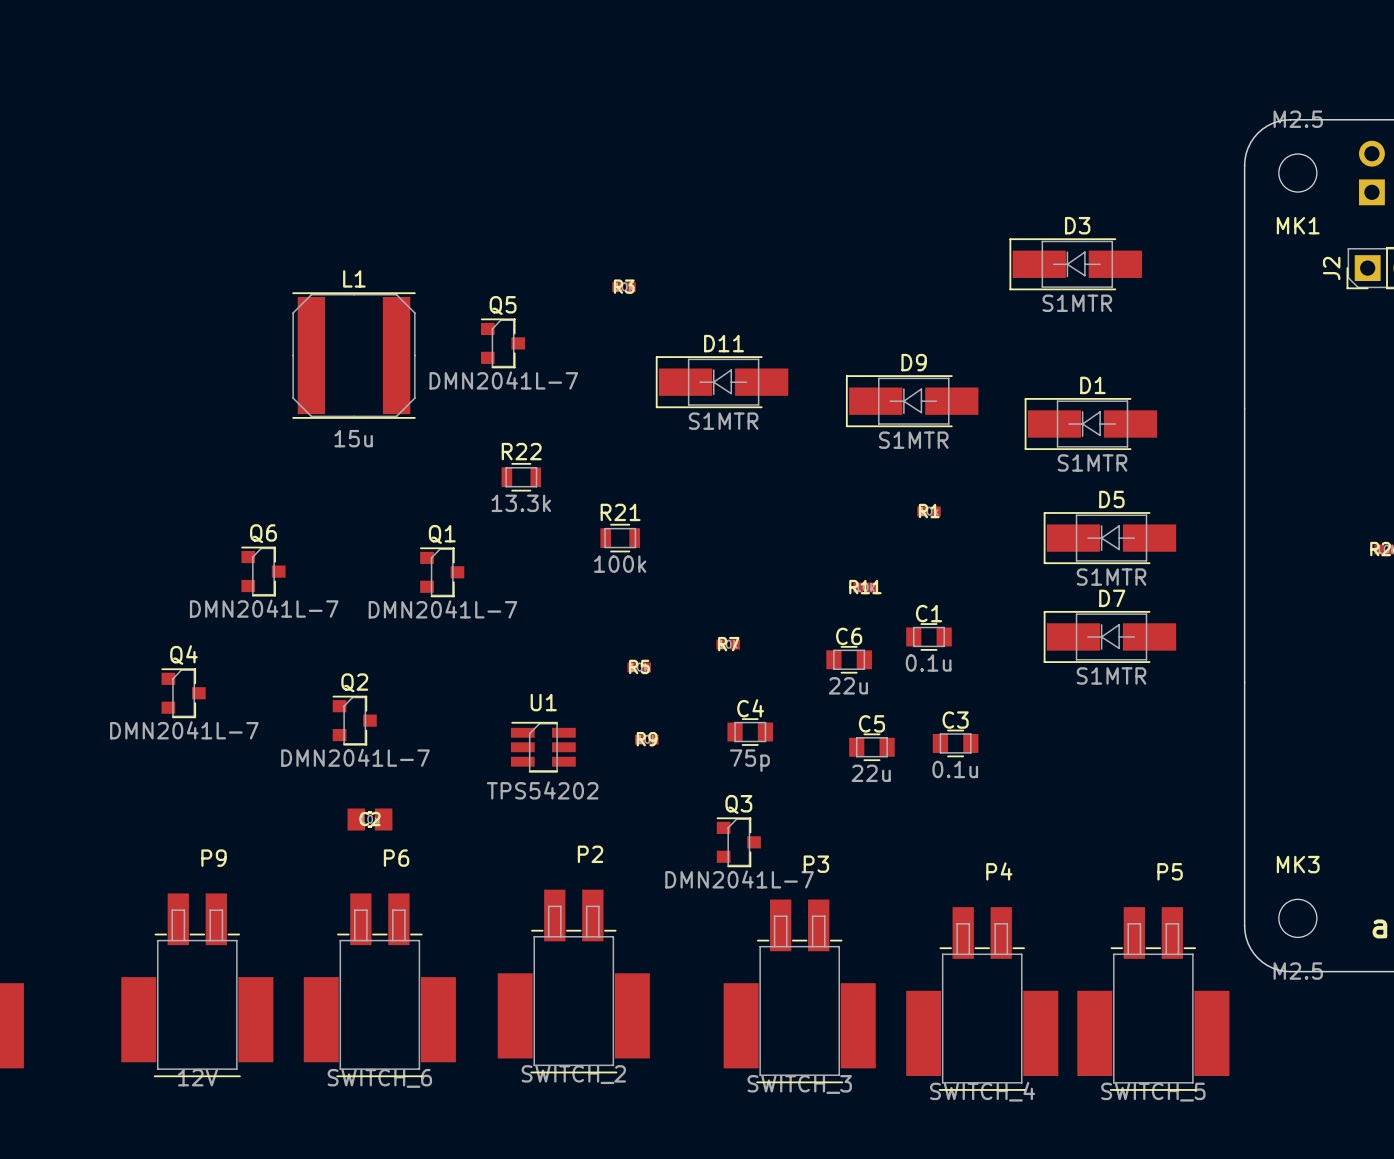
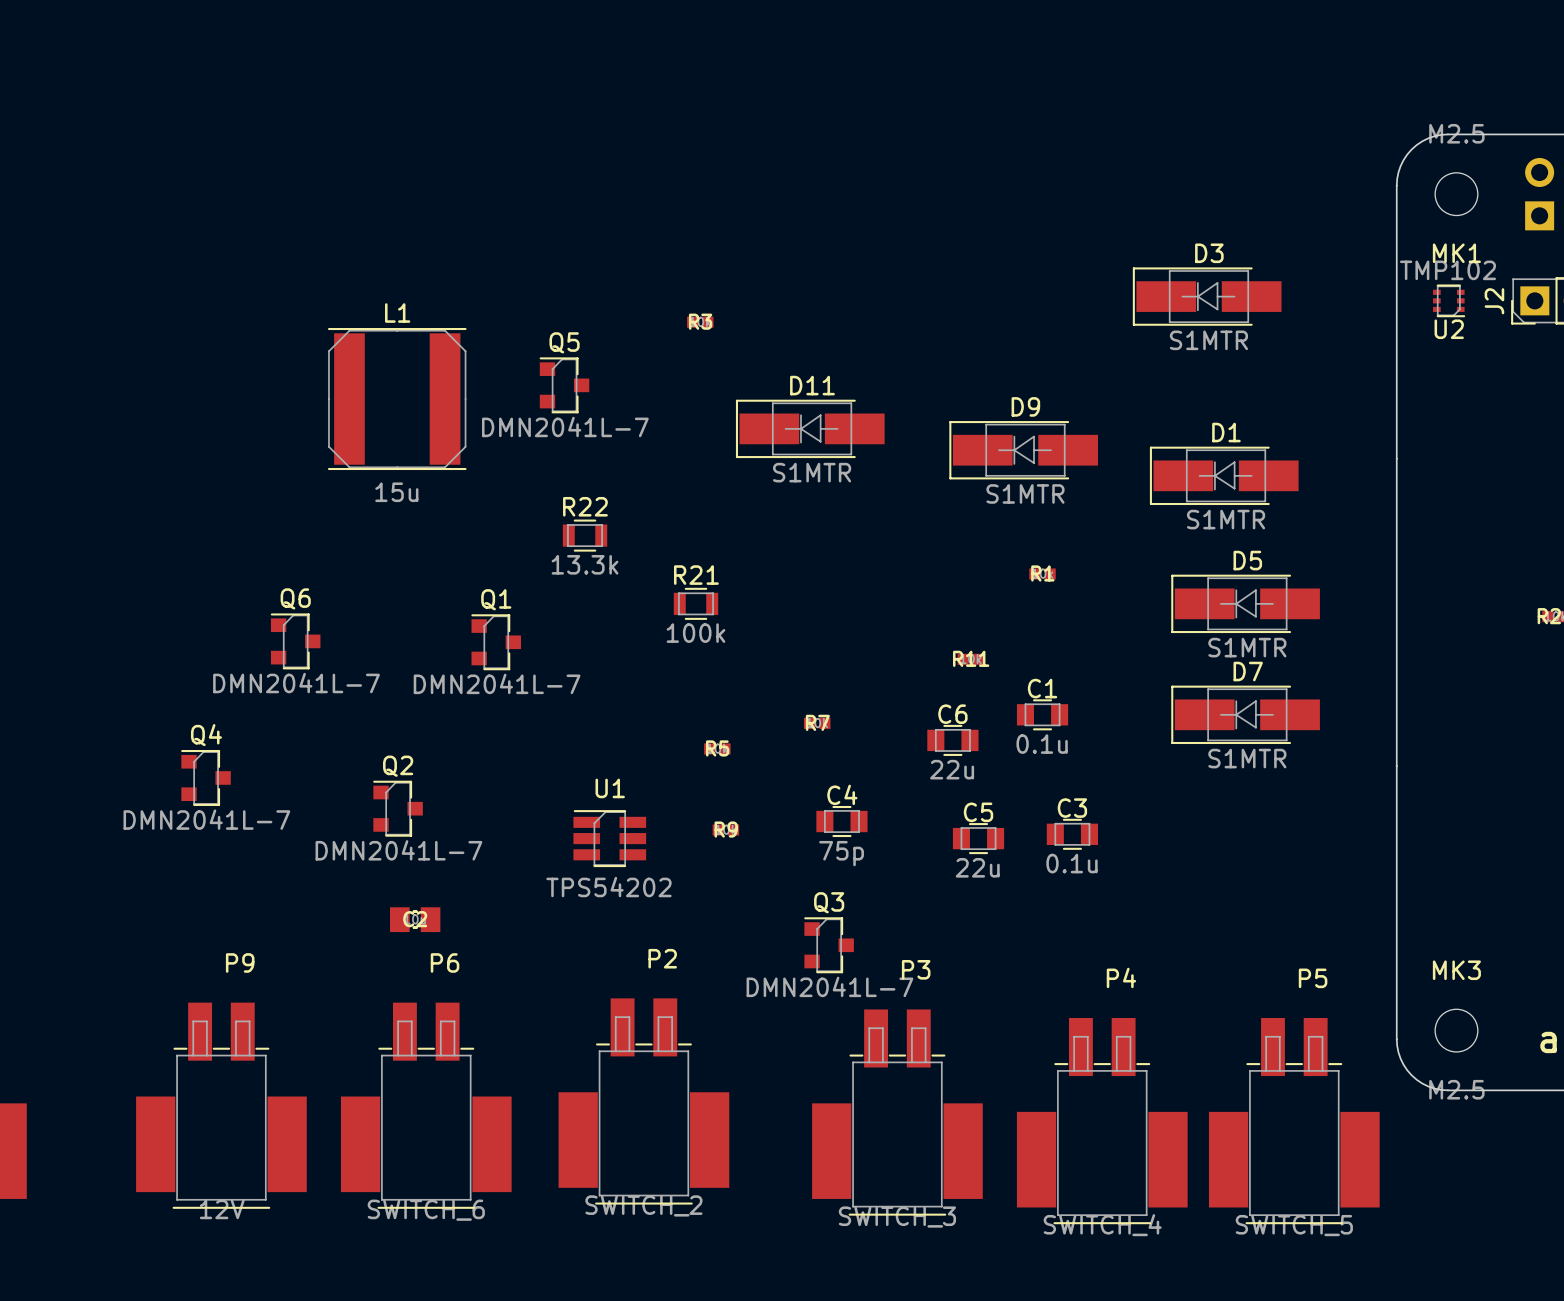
U2: none -> TMP102 (1449, 300)

